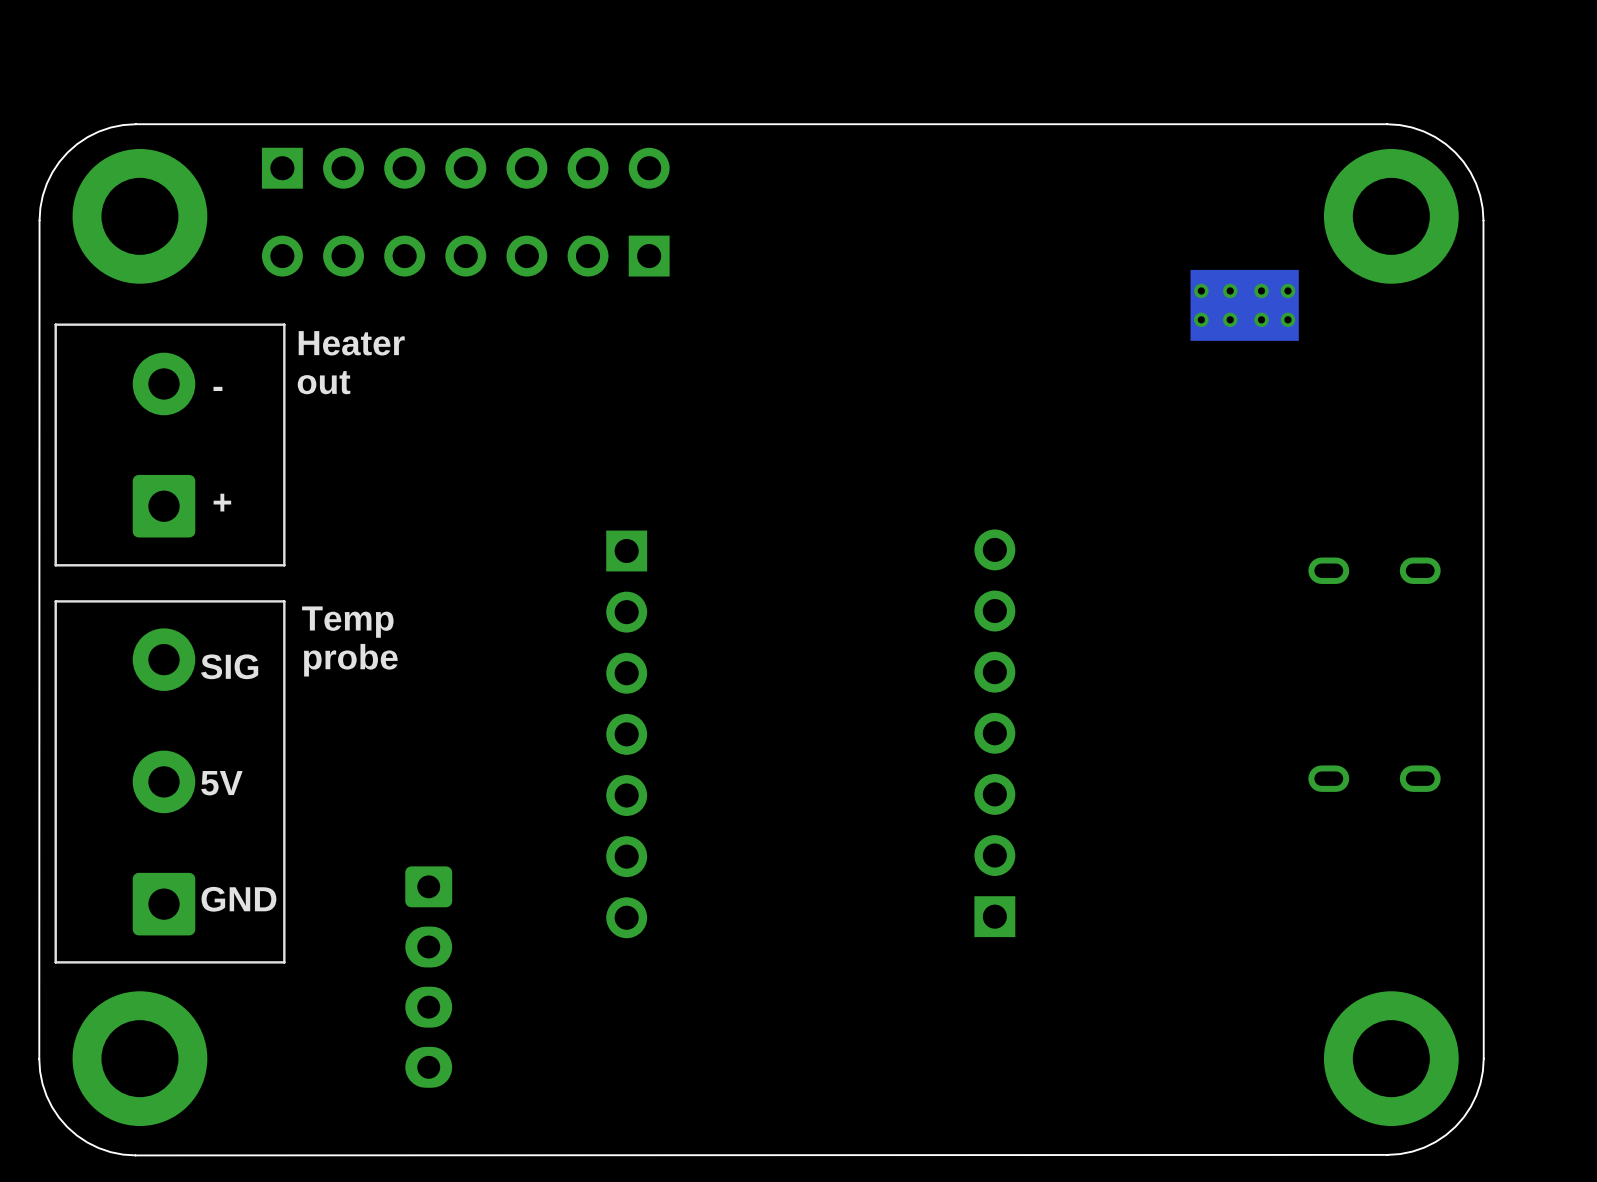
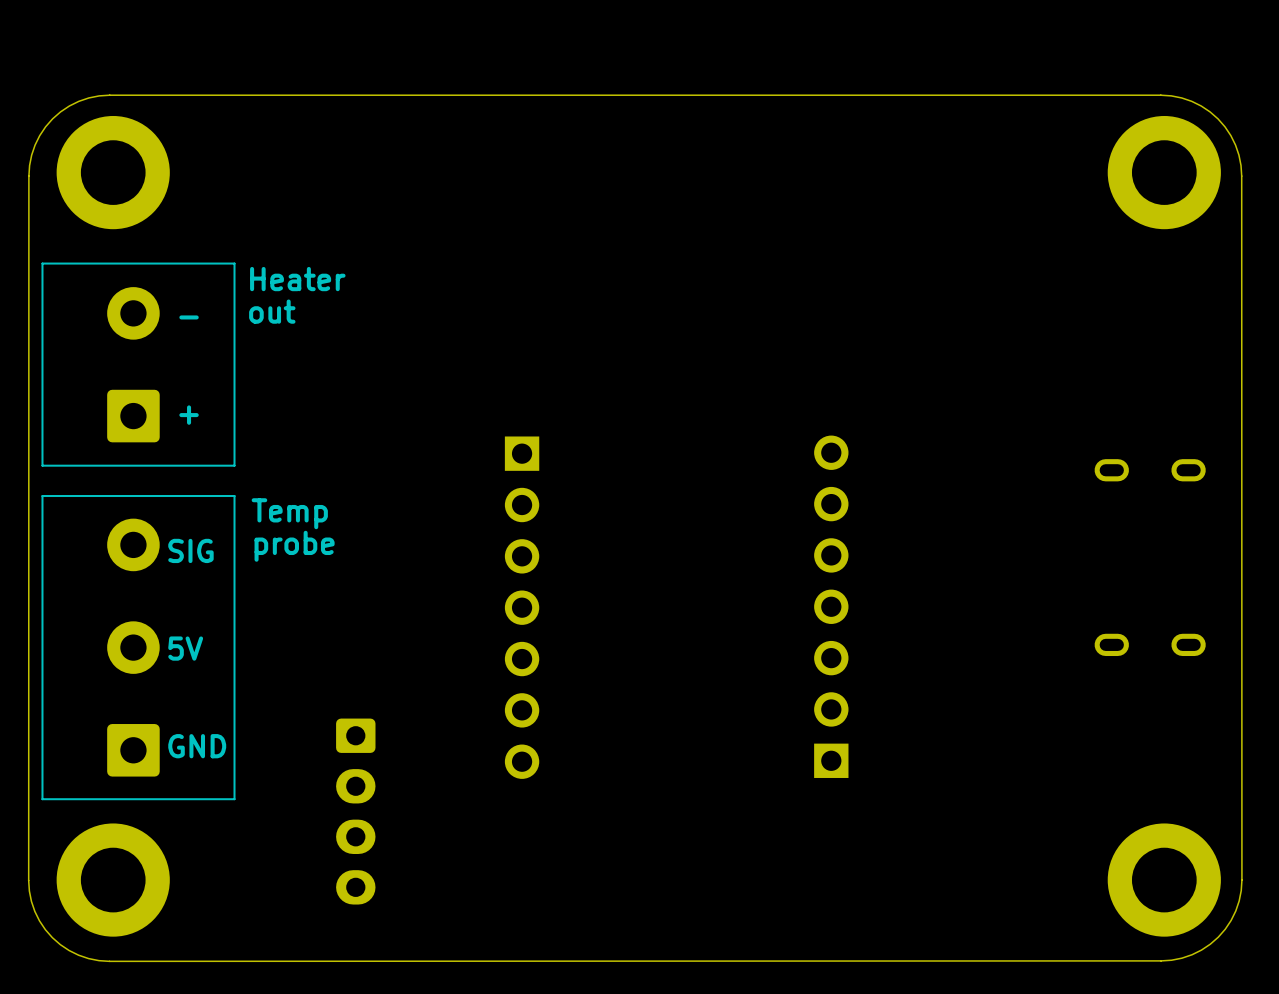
part: (465, 168) -> none
part: (465, 256) -> none
part: (1244, 305) -> none

